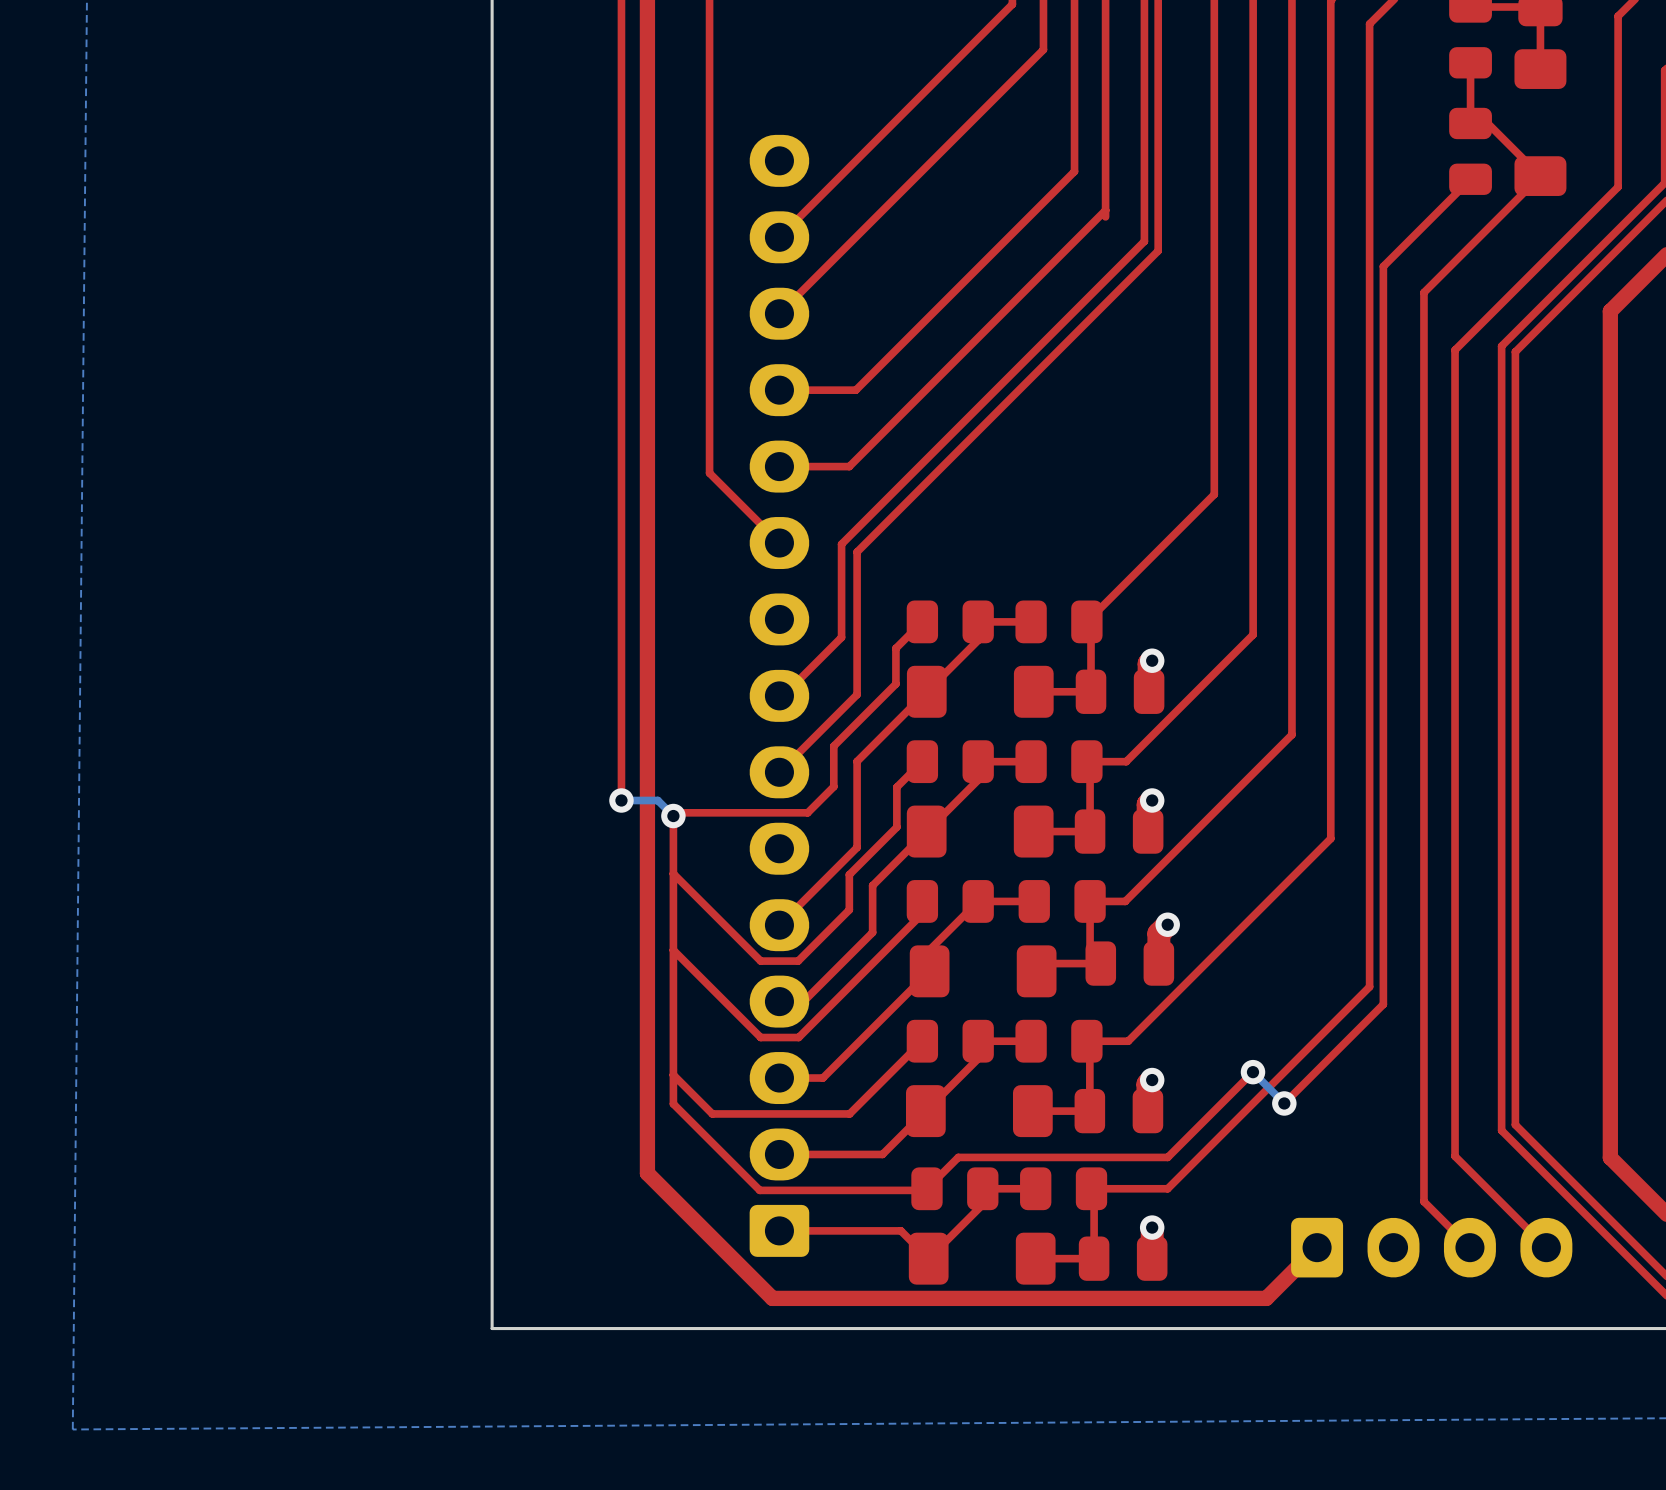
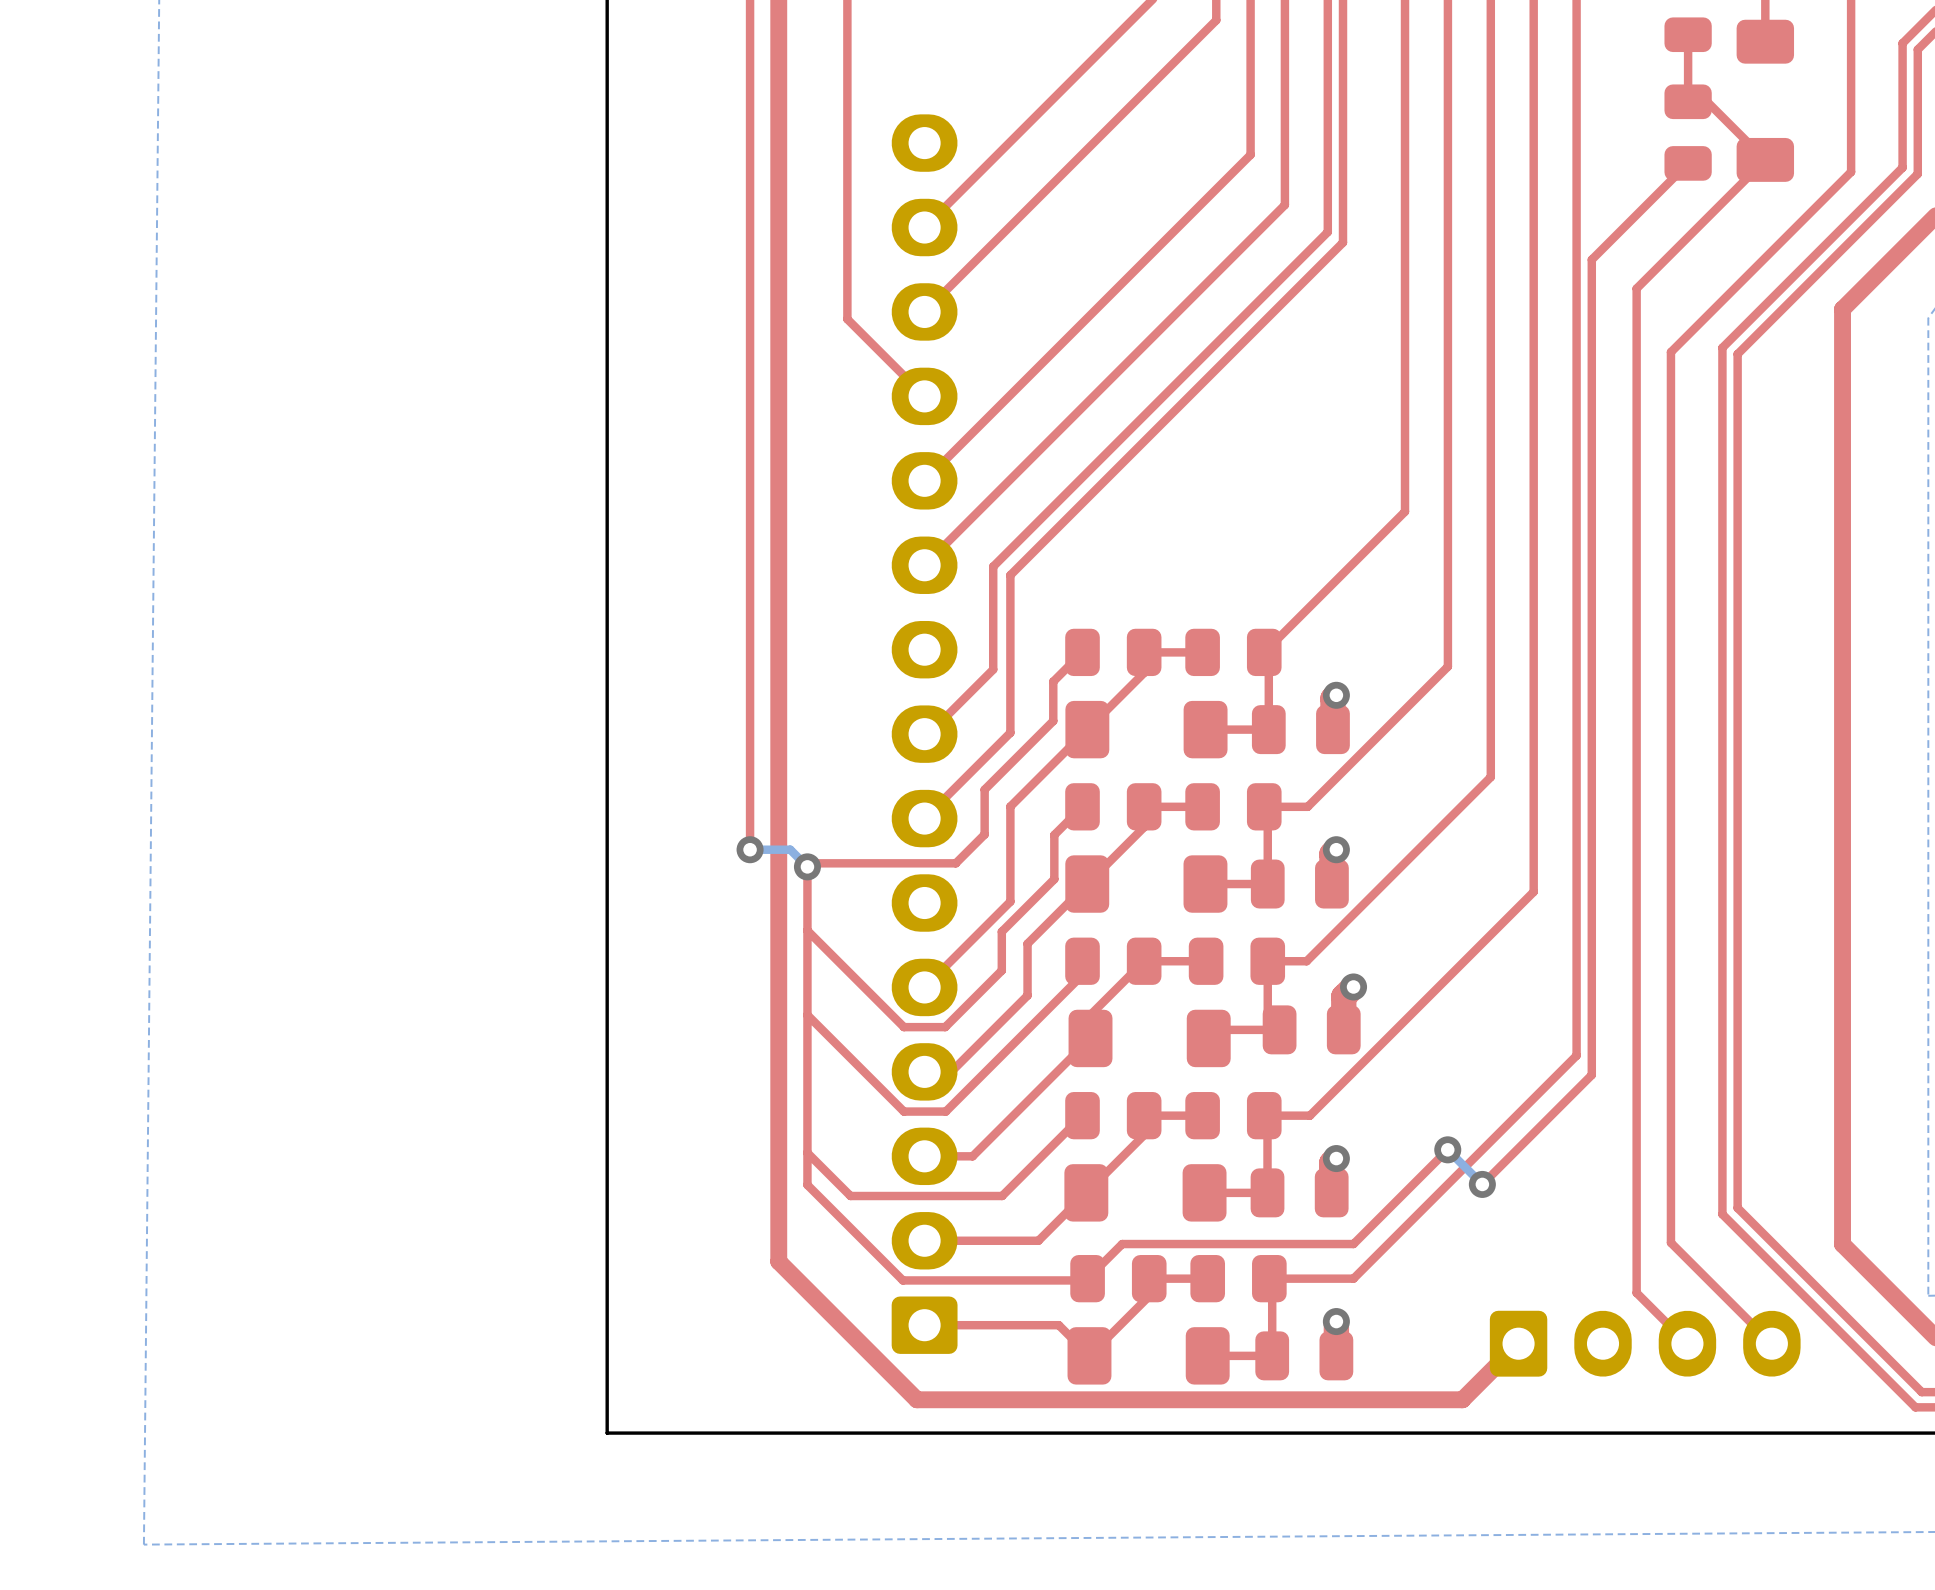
top track: (1105, 210) (849, 466) (779, 466) -> none
top track: none -> (1284, 204) (924, 565)
top track: (709, 320) (709, 473) (769, 533) -> (847, 319) (924, 396)
top track: (855, 390) (779, 390) -> (1009, 396) (924, 480)

